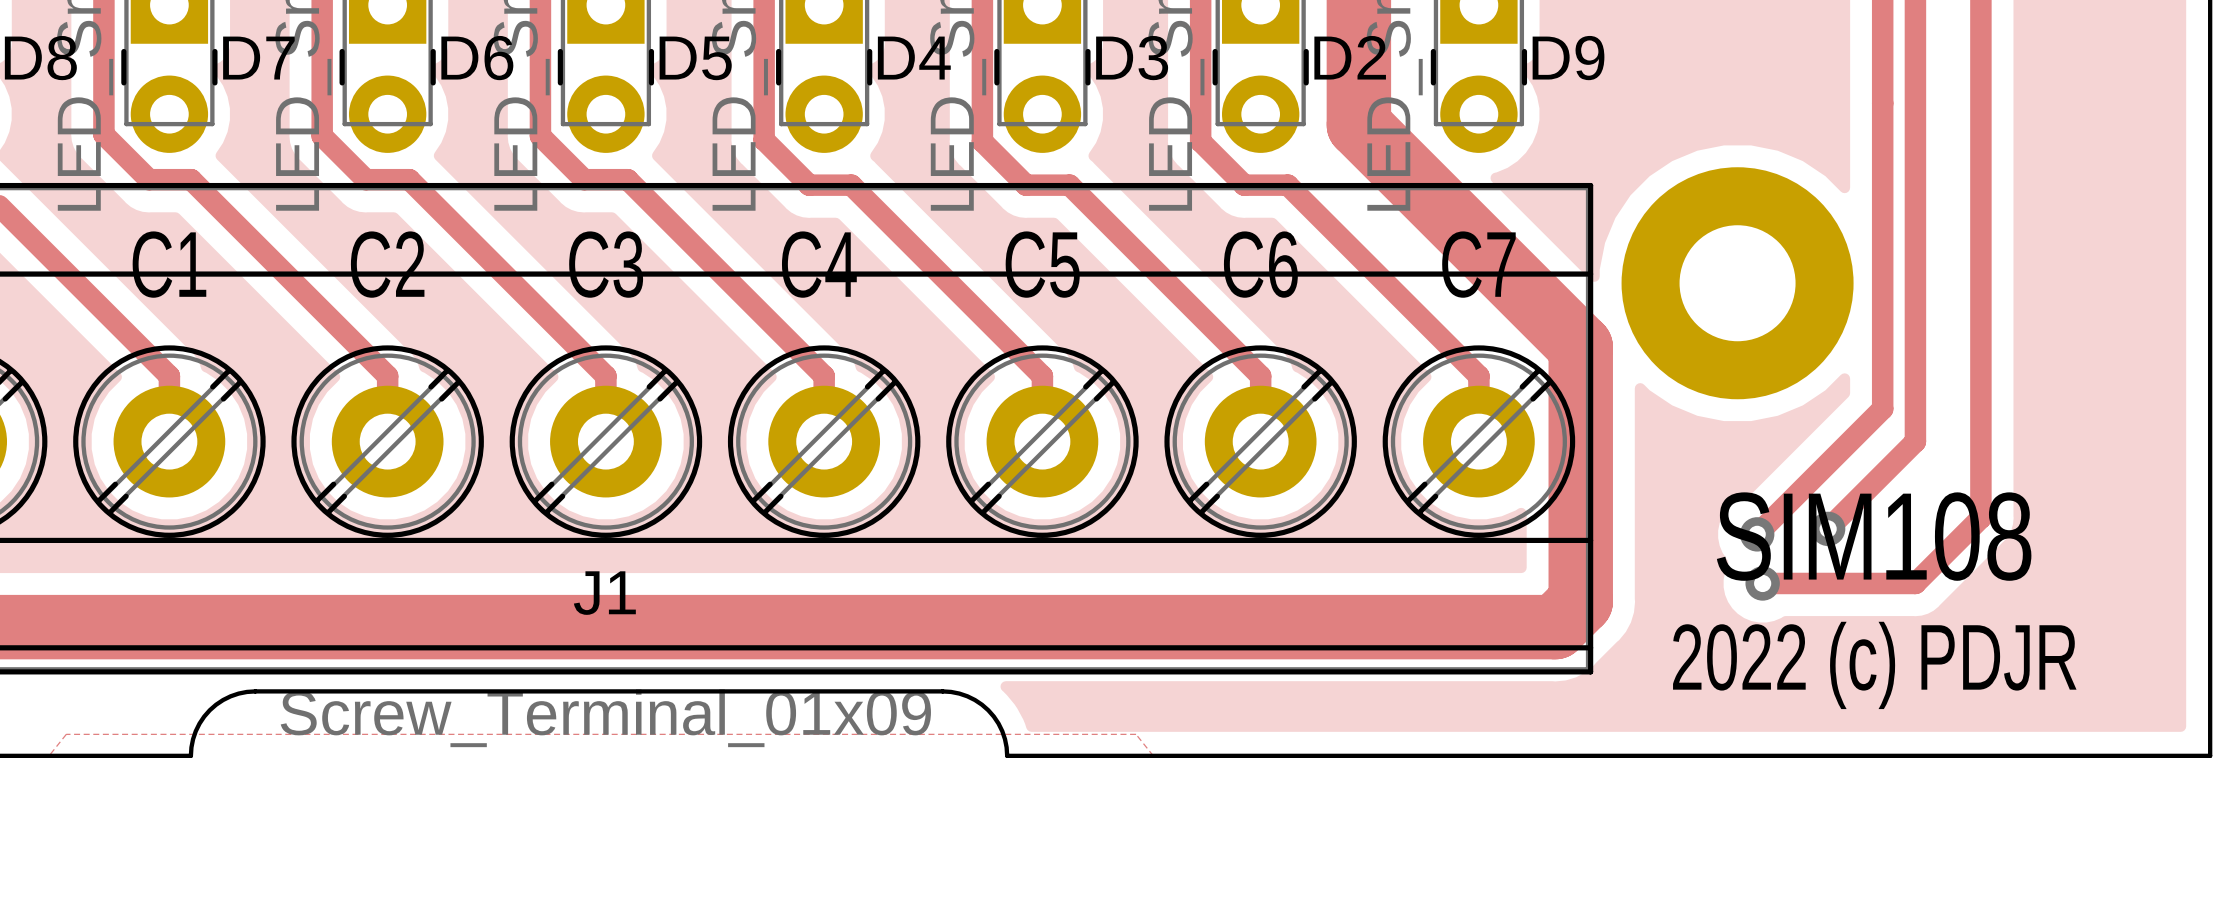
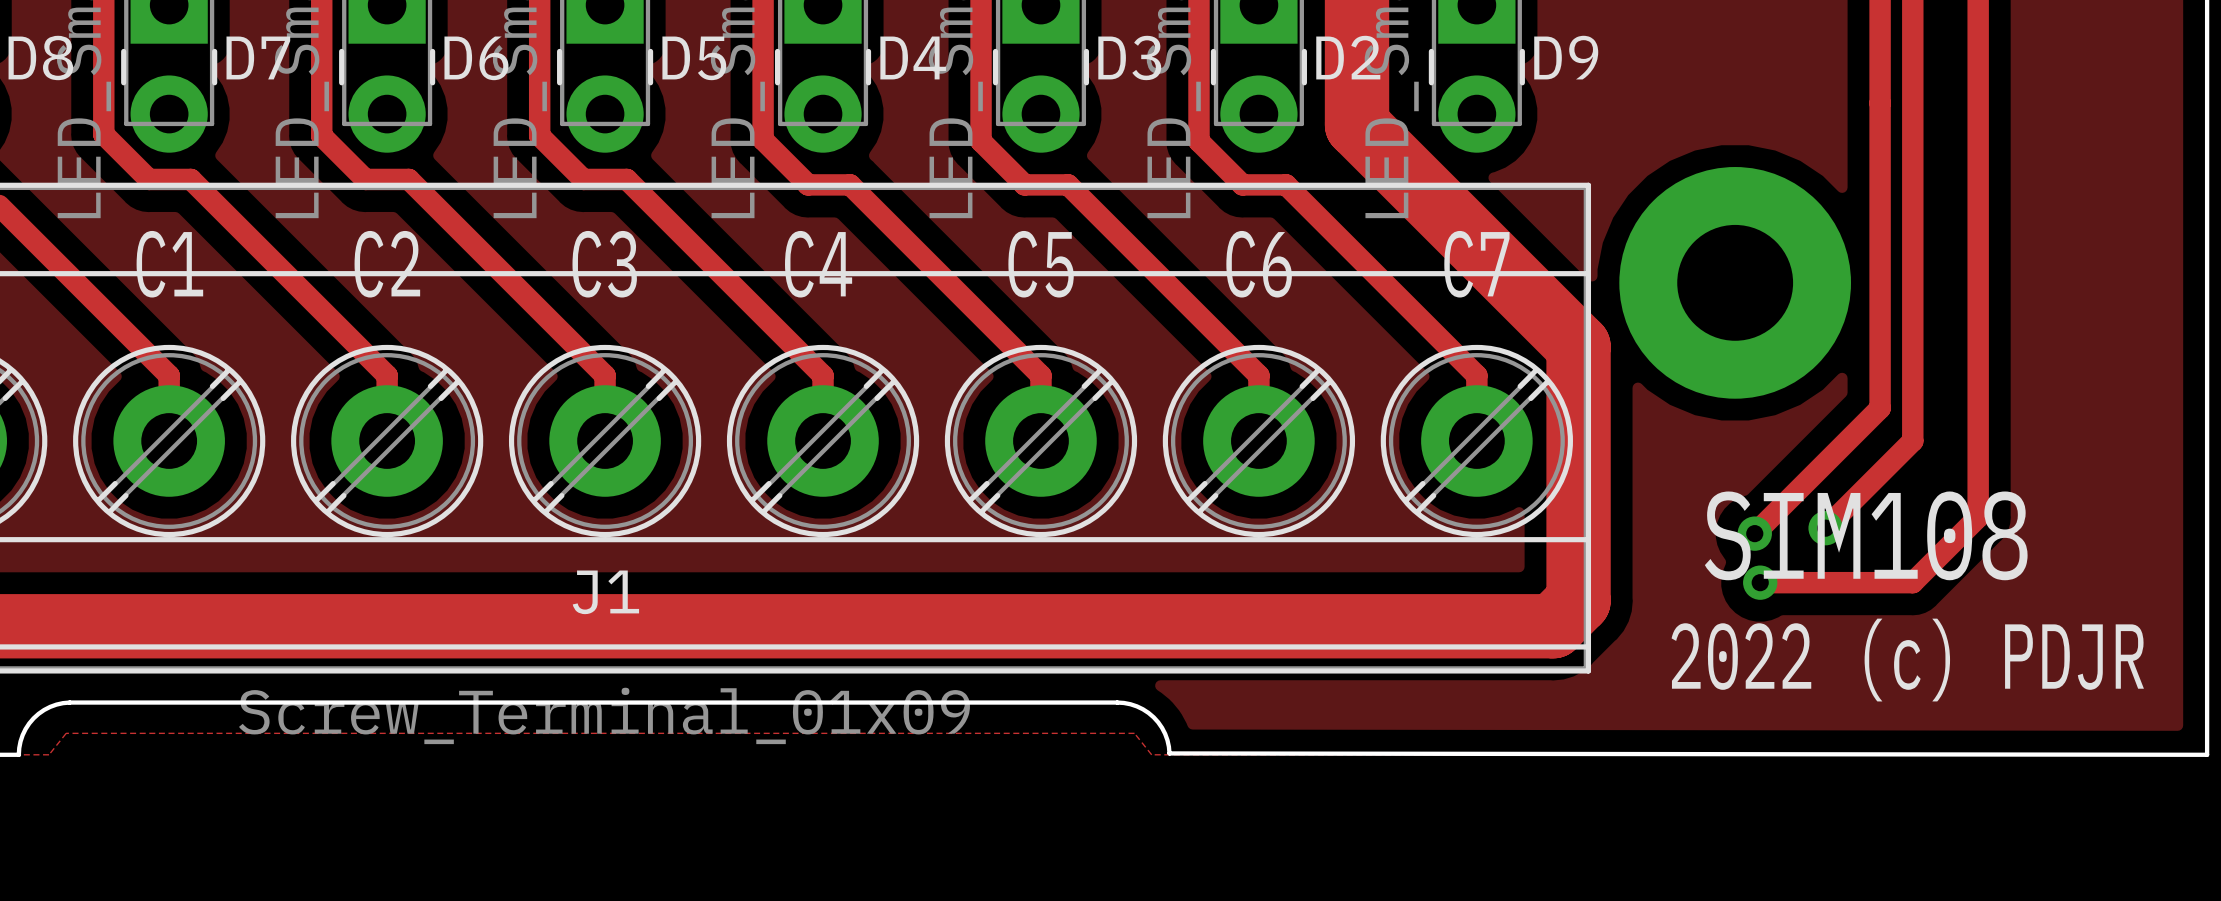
board edge: (19, 755) (190, 755) (195, 731) (209, 710) (230, 696) (255, 691) (951, 691) (967, 696) (988, 710) (1002, 731) (1007, 755) (2210, 755) -> (18, 754) (22, 735) (33, 718) (50, 706) (69, 702) (1117, 702) (1136, 706) (1153, 717) (1165, 733) (1169, 753) (2207, 754)

